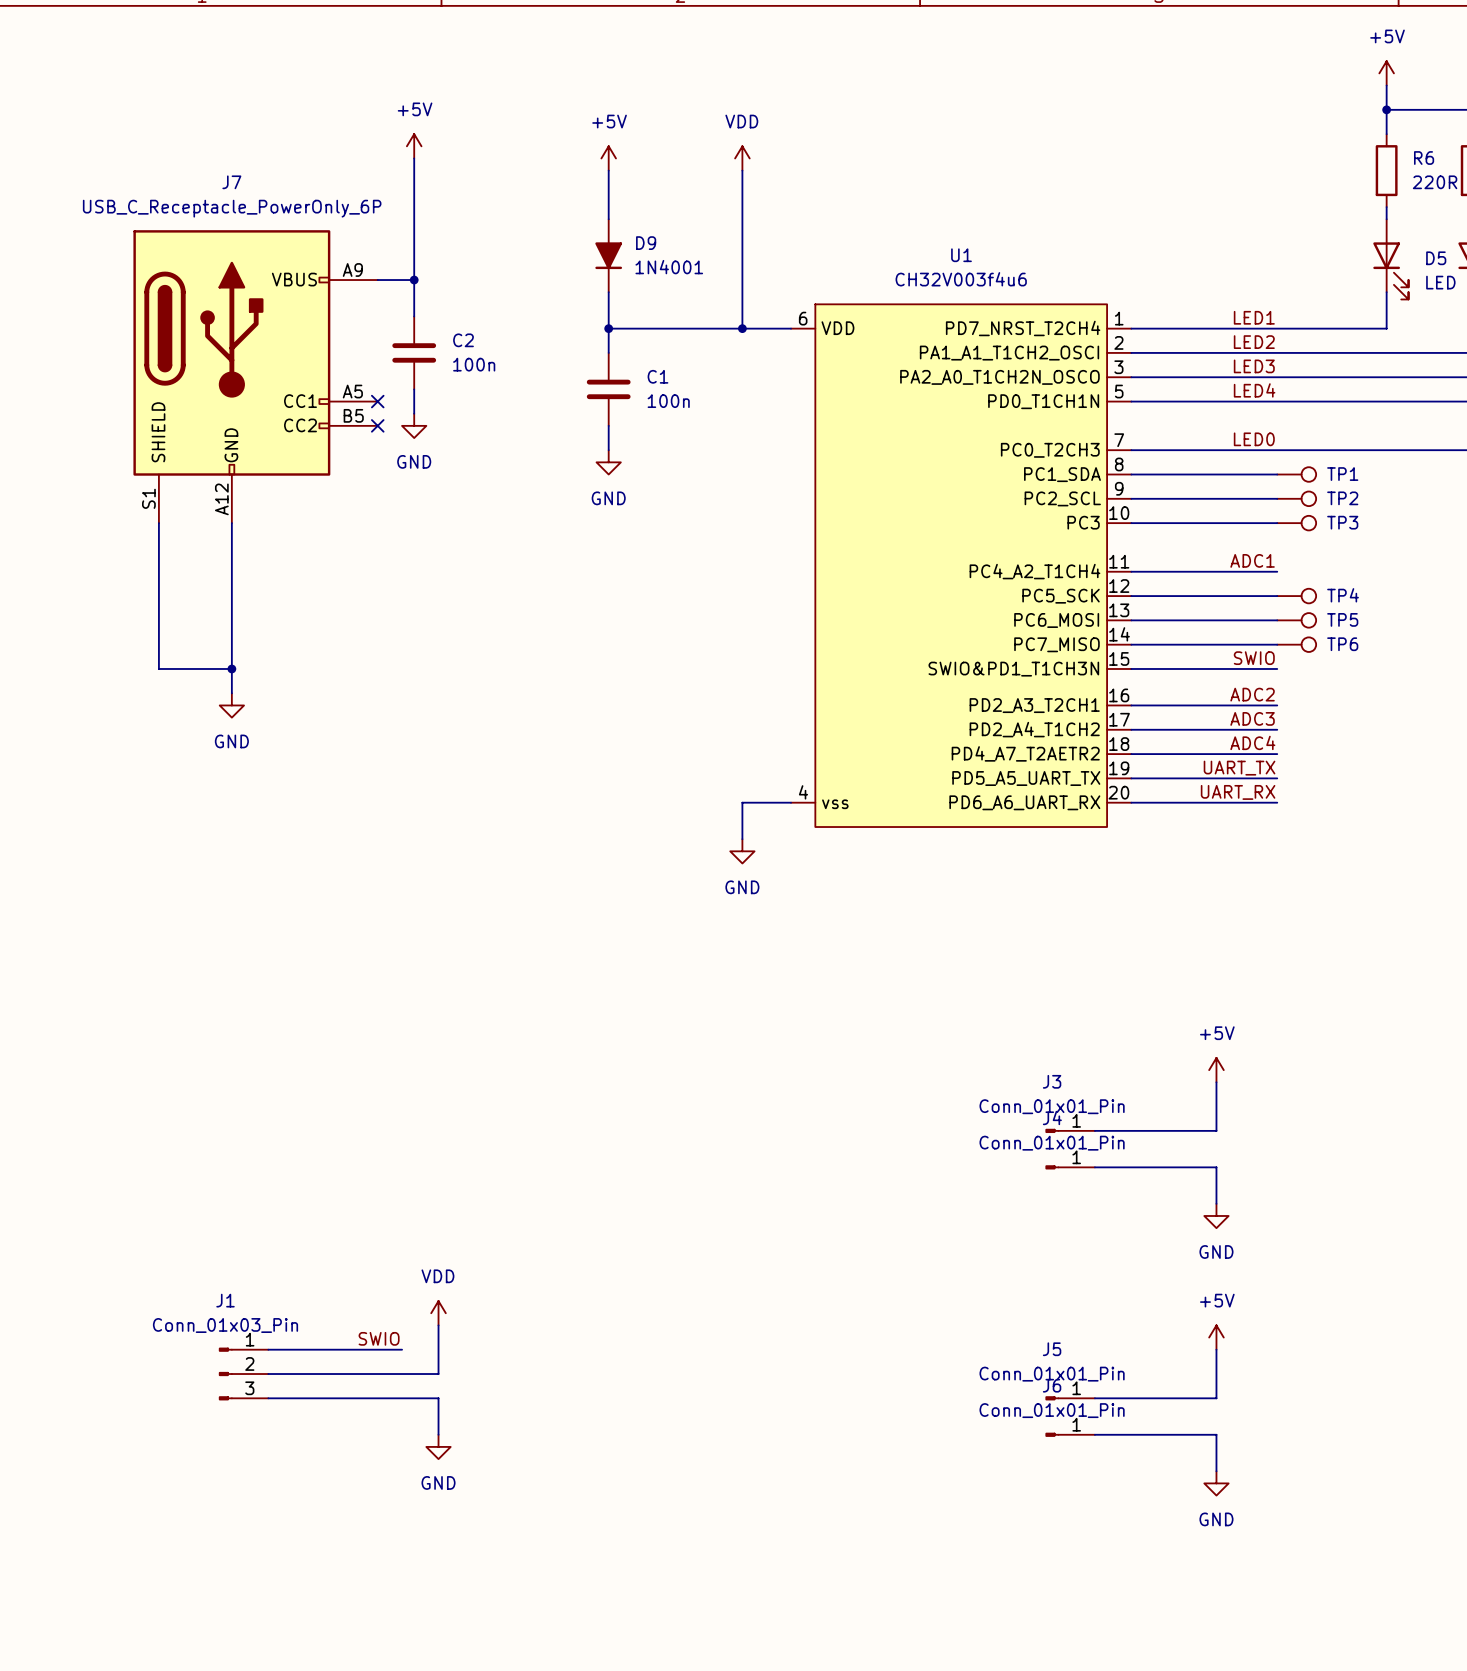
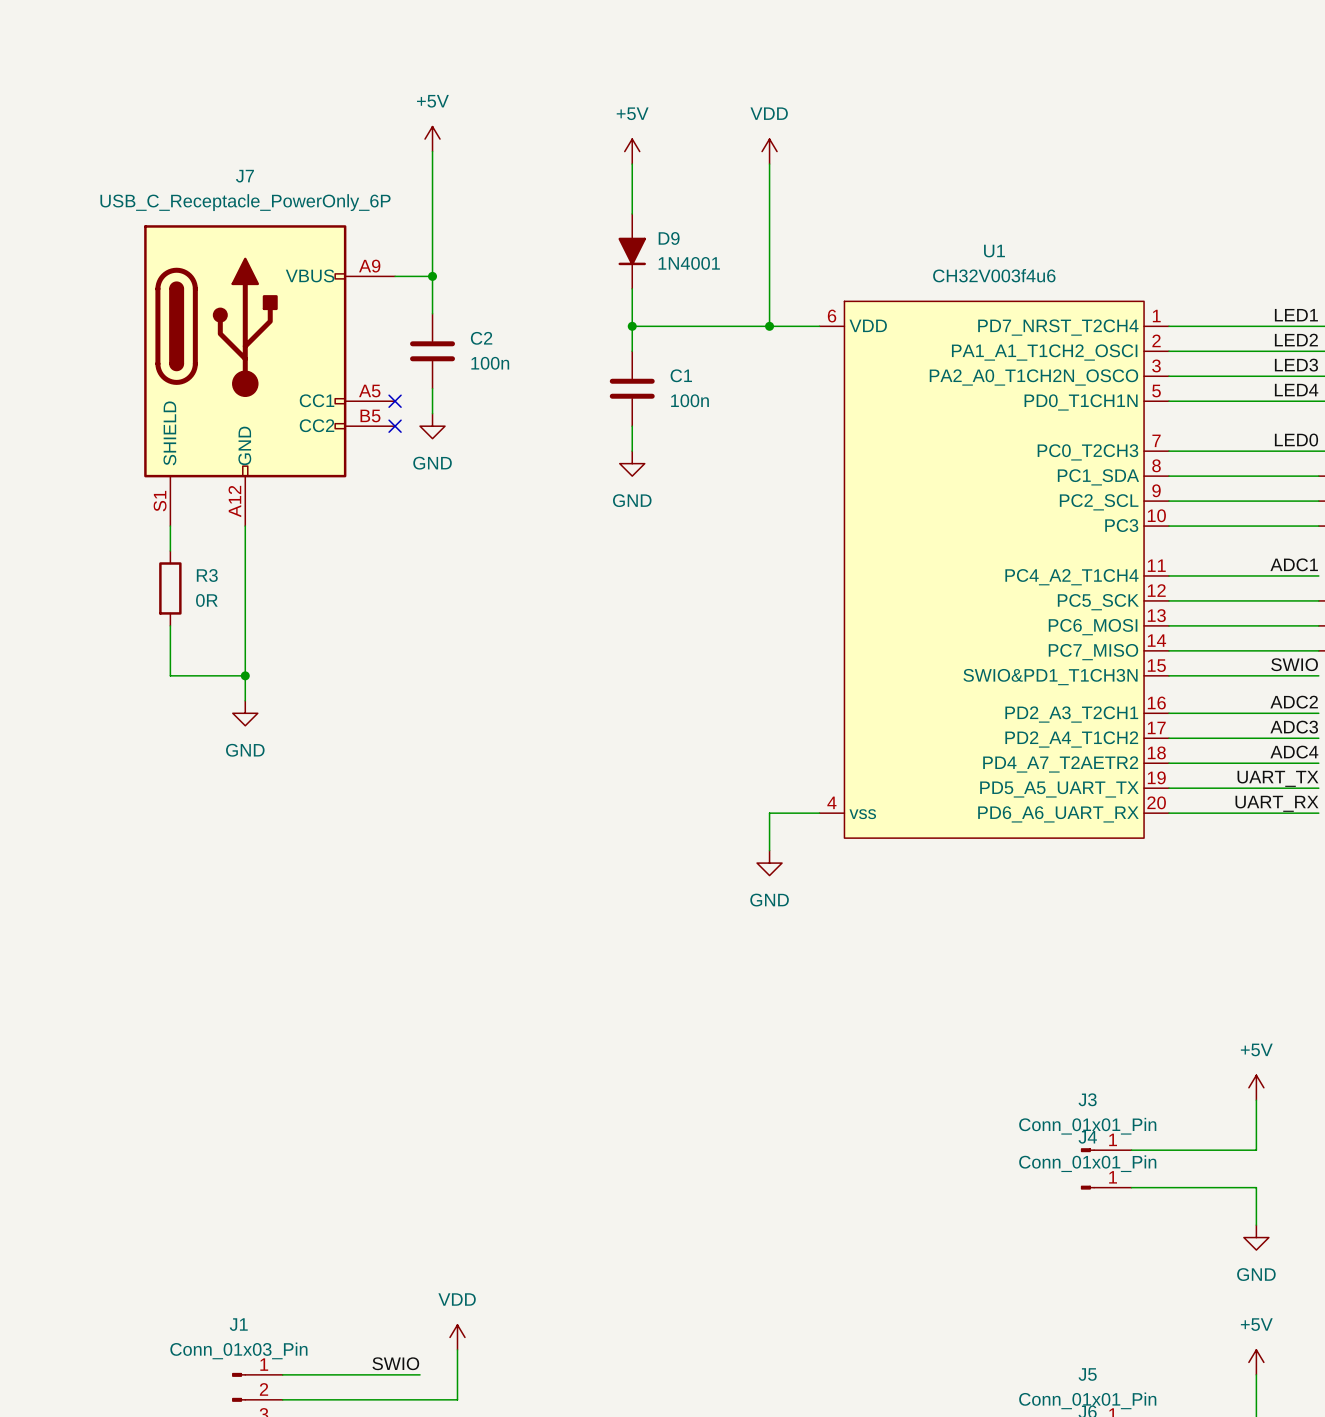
wire: (158, 547) (158, 620) -> none
R3: none -> 0R (170, 588)

